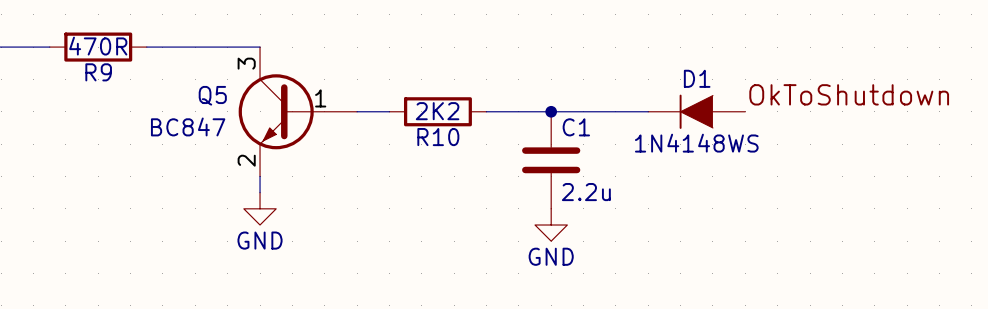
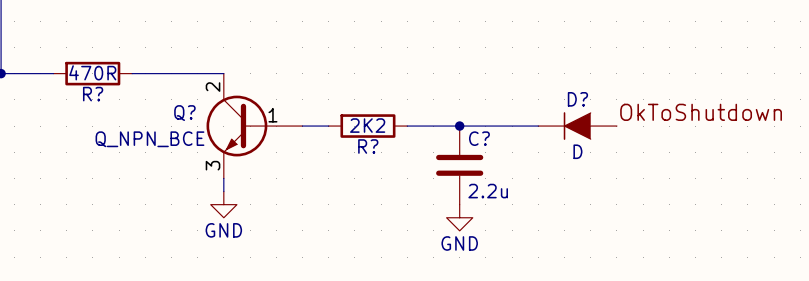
Q5 pin number: 3 (246, 63) -> 2 (213, 87)
R9 name: R9 (98, 72) -> R? (93, 94)
D1 name: D1 (697, 78) -> D? (577, 99)
Q5 name: Q5 (212, 95) -> Q? (184, 113)
Q5 value: BC847 (188, 126) -> Q_NPN_BCE (149, 139)
C1 name: C1 (576, 127) -> C? (479, 138)
R10 name: R10 (438, 137) -> R? (368, 146)
D1 value: 1N4148WS (696, 143) -> D (577, 151)
Q5 pin number: 2 (246, 160) -> 3 (213, 165)

